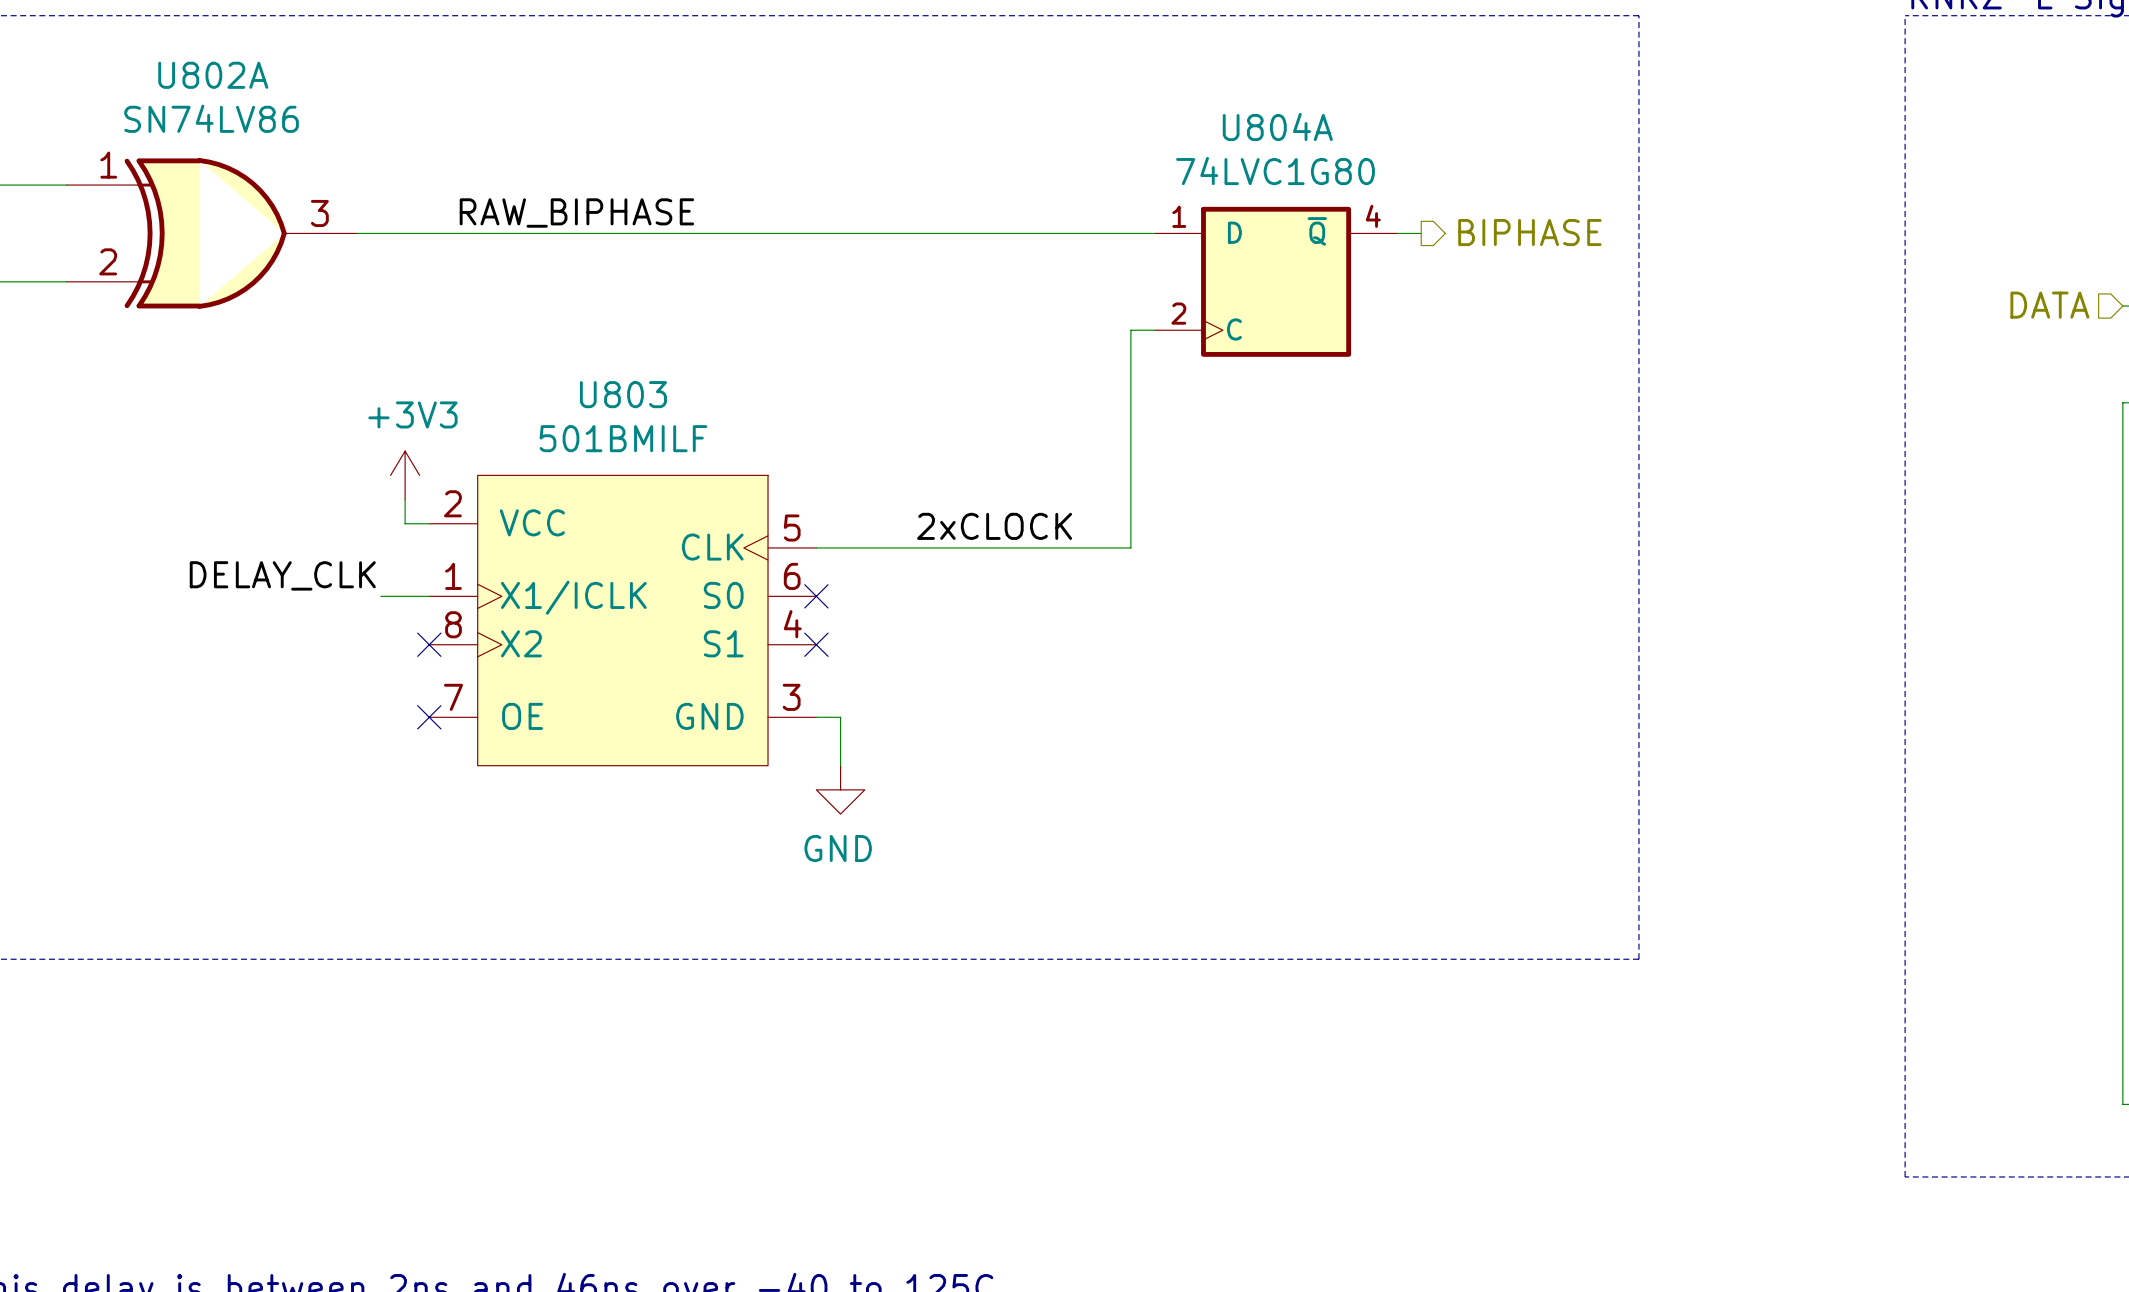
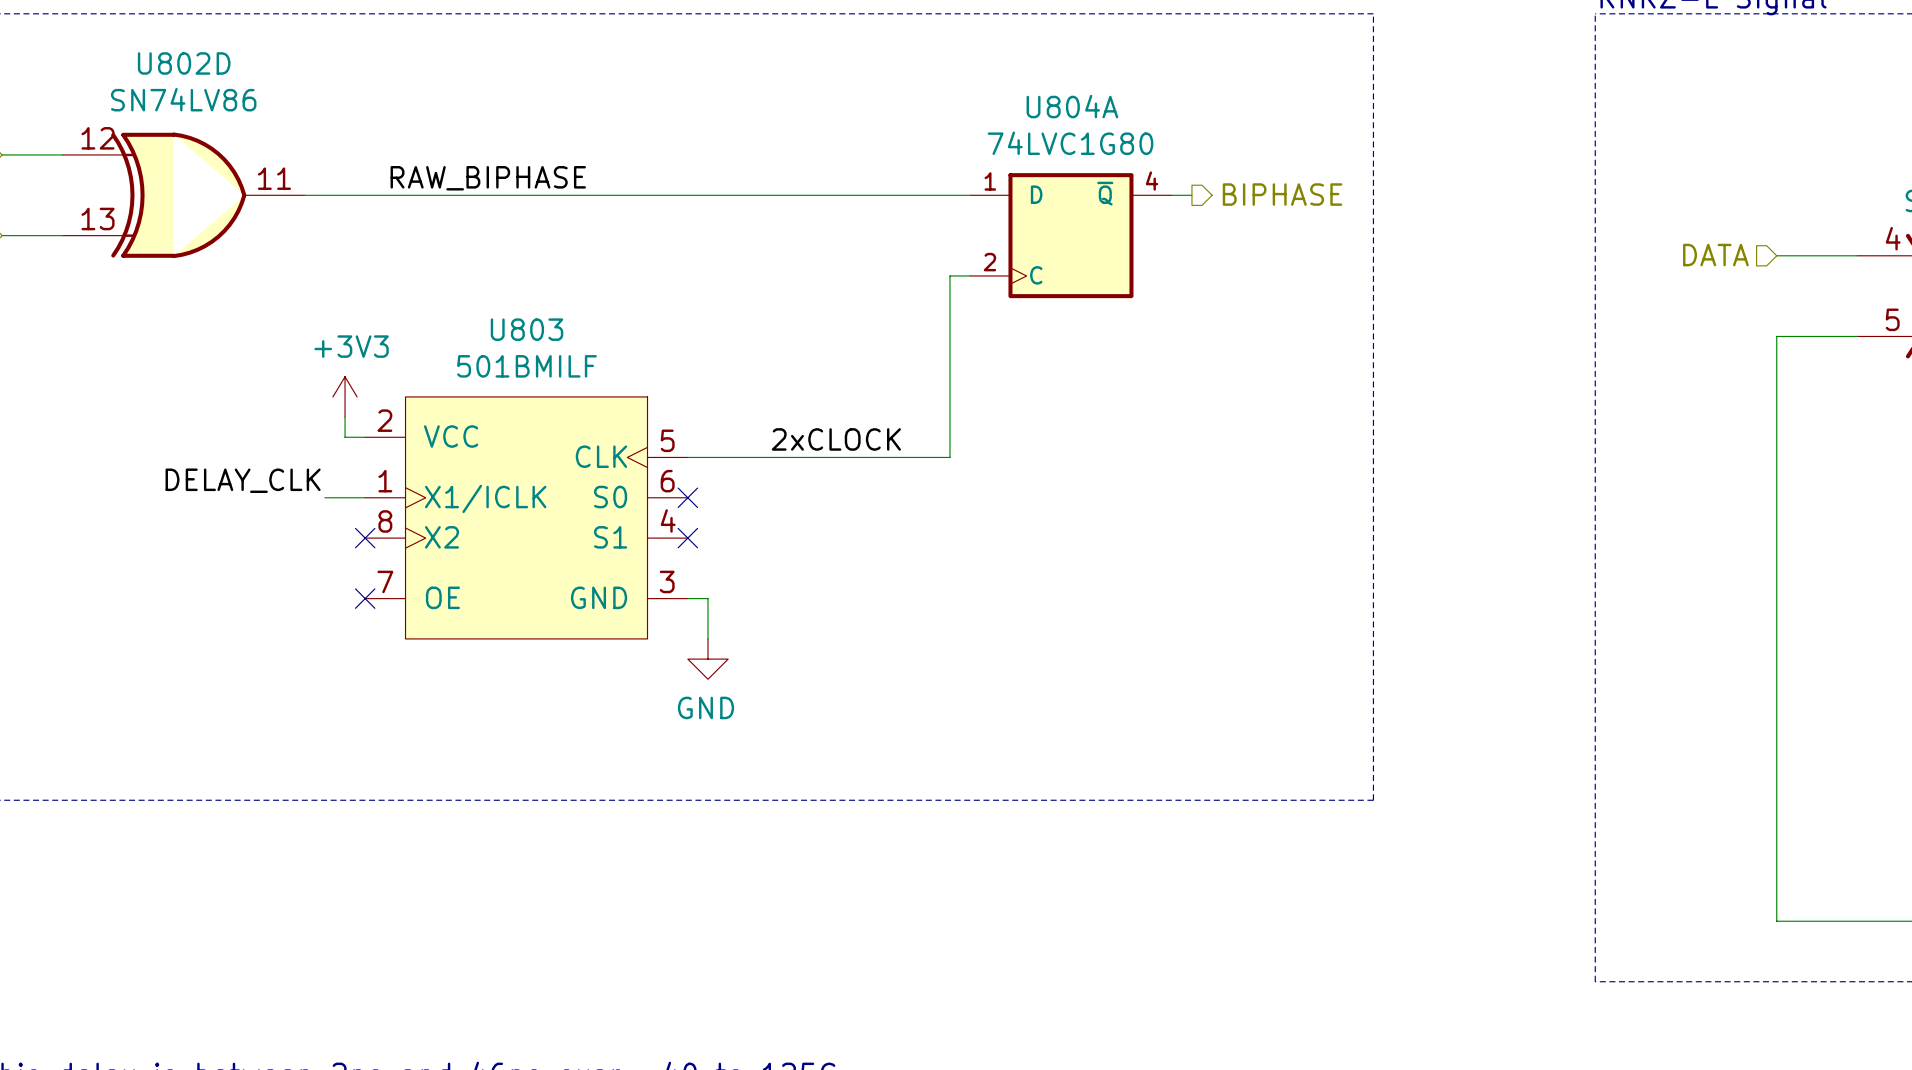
U802A name: U802A (213, 75) -> U802D (184, 63)
U802A pin number: 1 (108, 165) -> 12 (98, 138)
U802A pin number: 3 (319, 213) -> 11 (274, 178)
U802A pin number: 2 (108, 261) -> 13 (98, 219)

